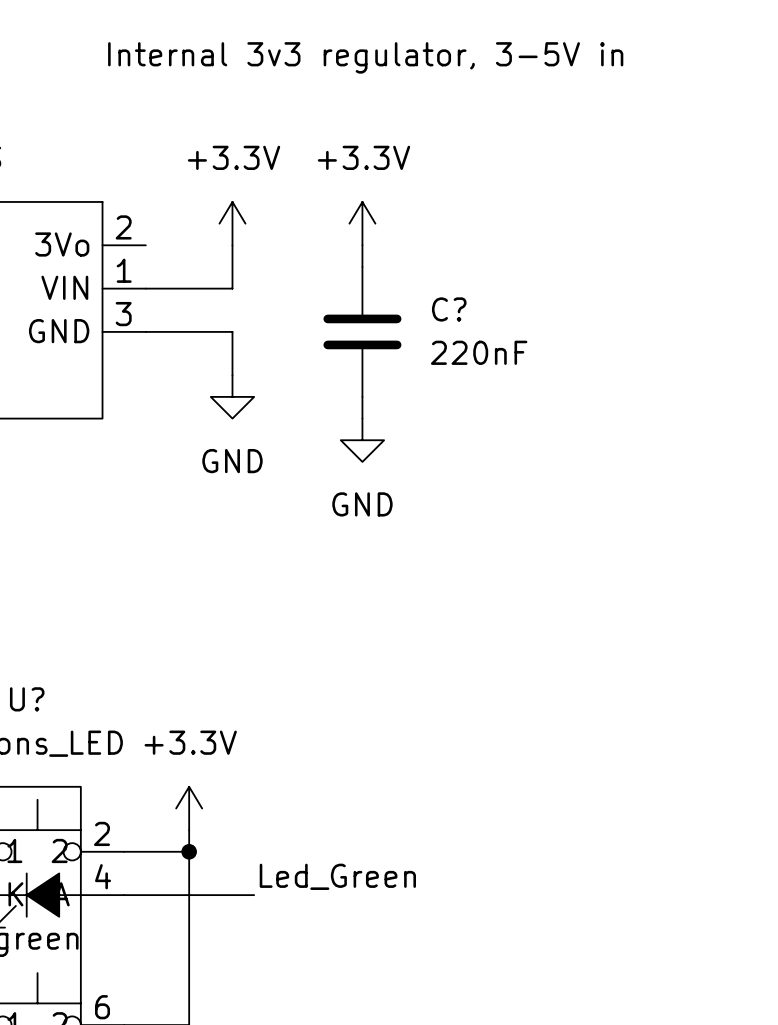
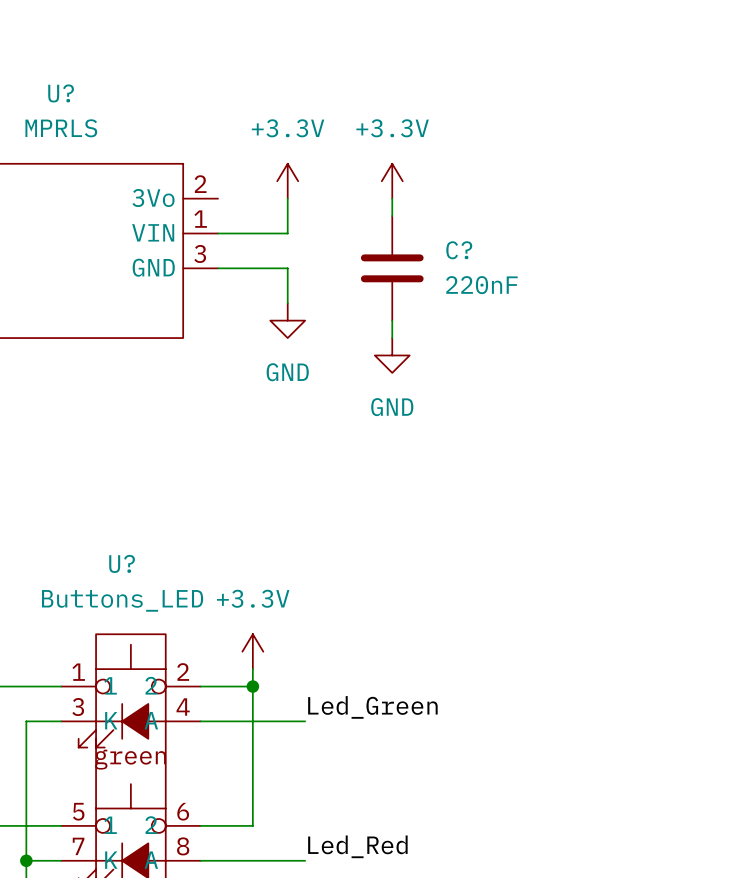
text: Internal 3v3 regulator, 3-5V in (365, 57) -> none

